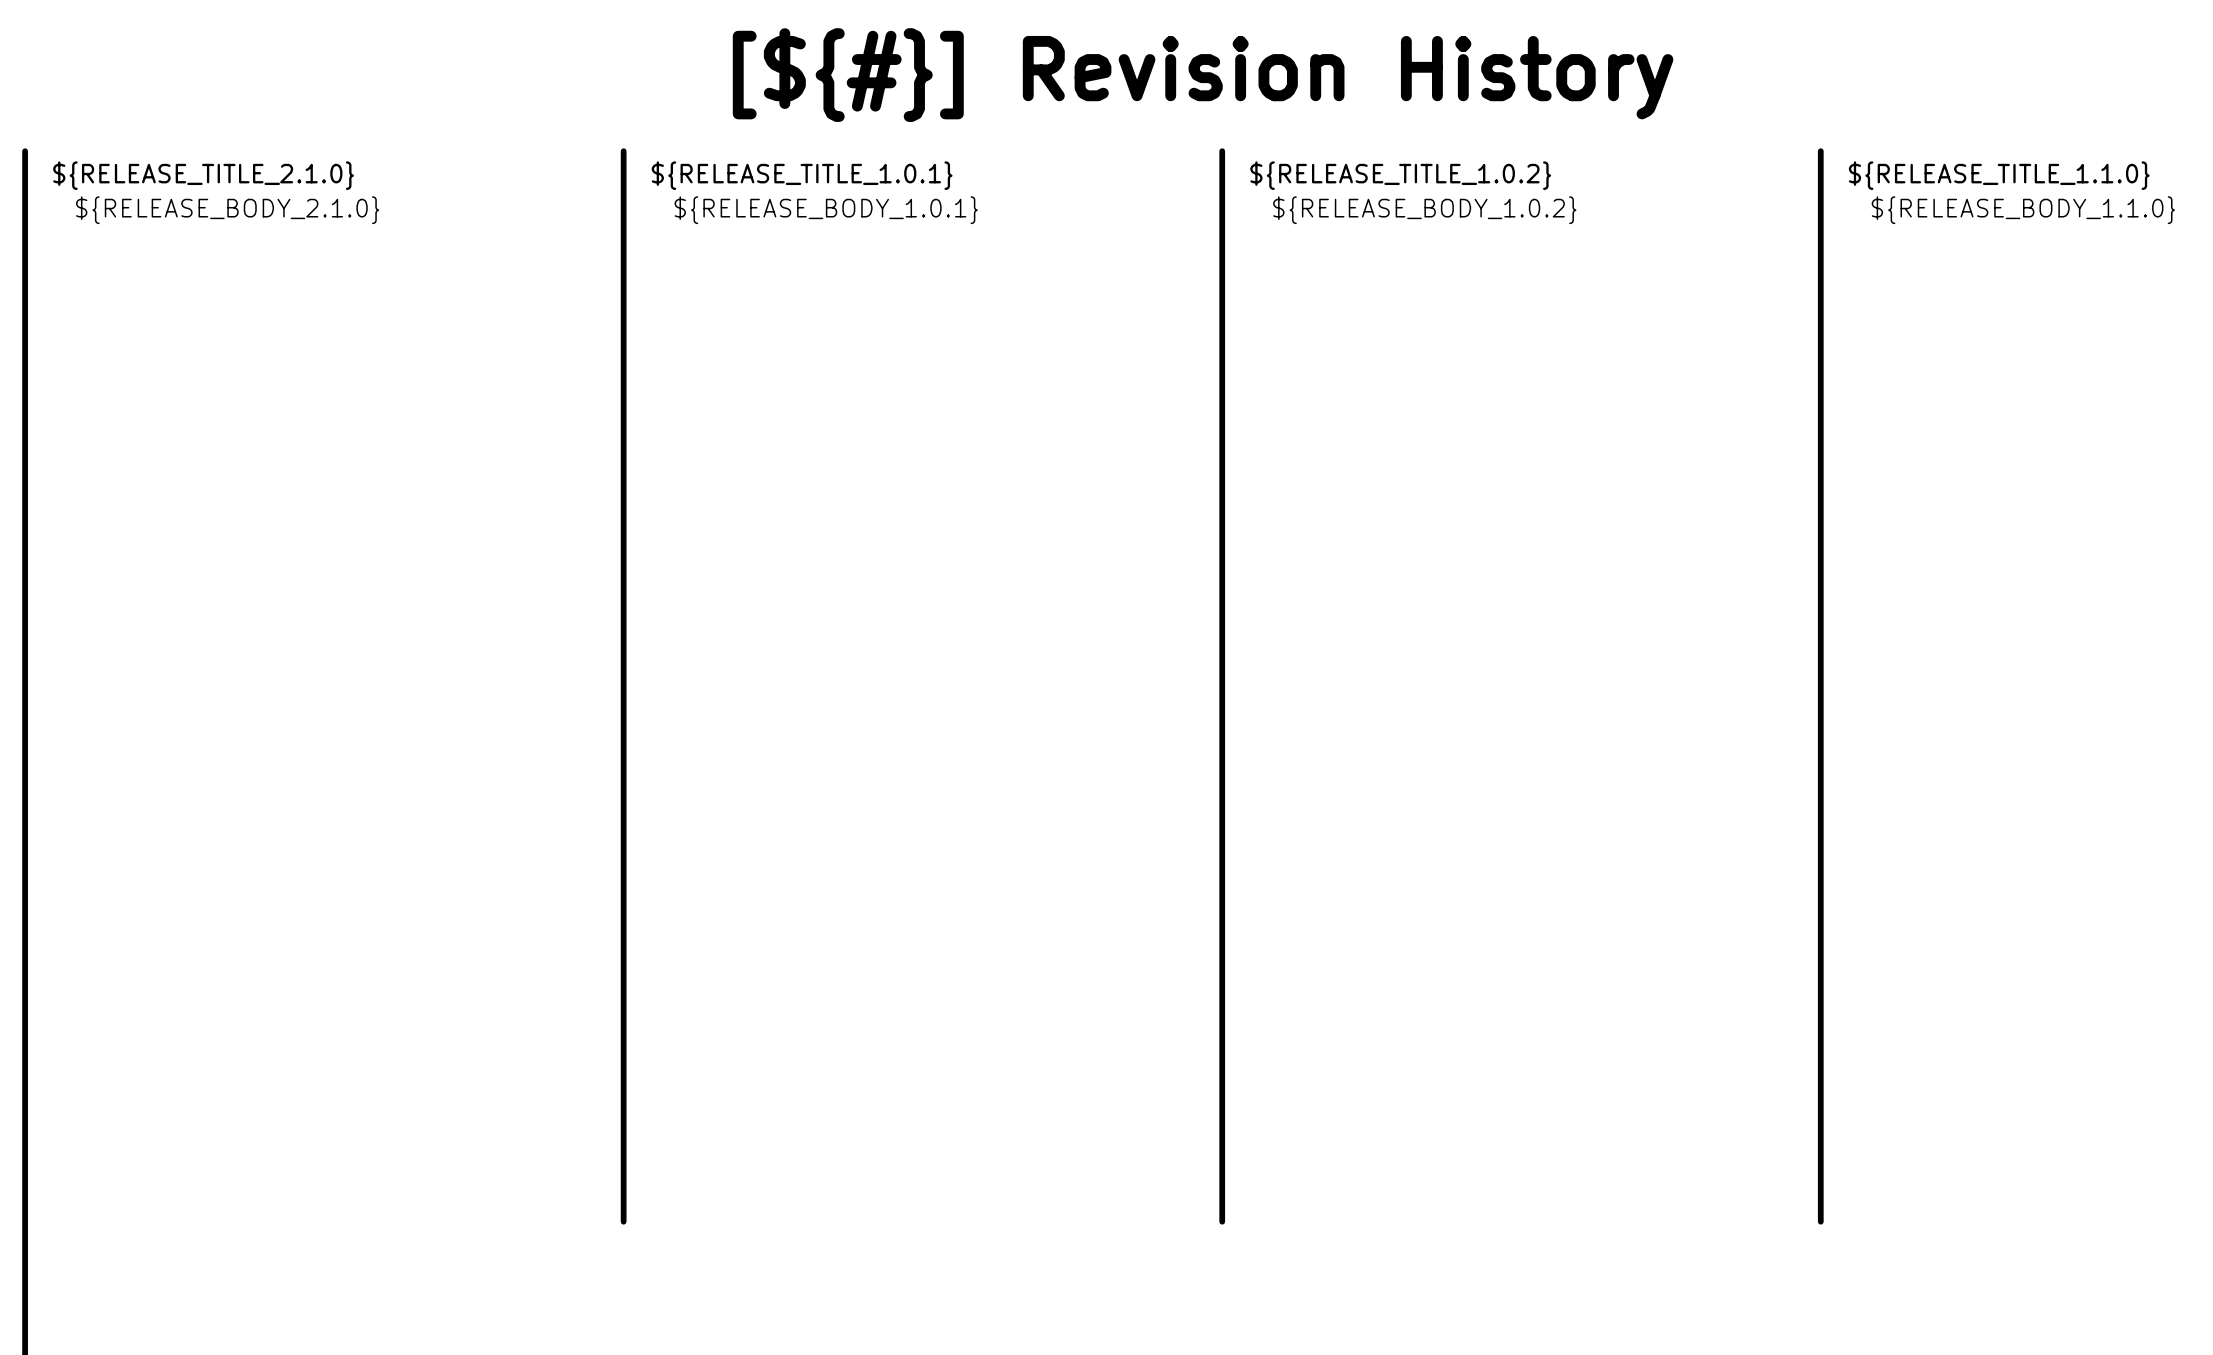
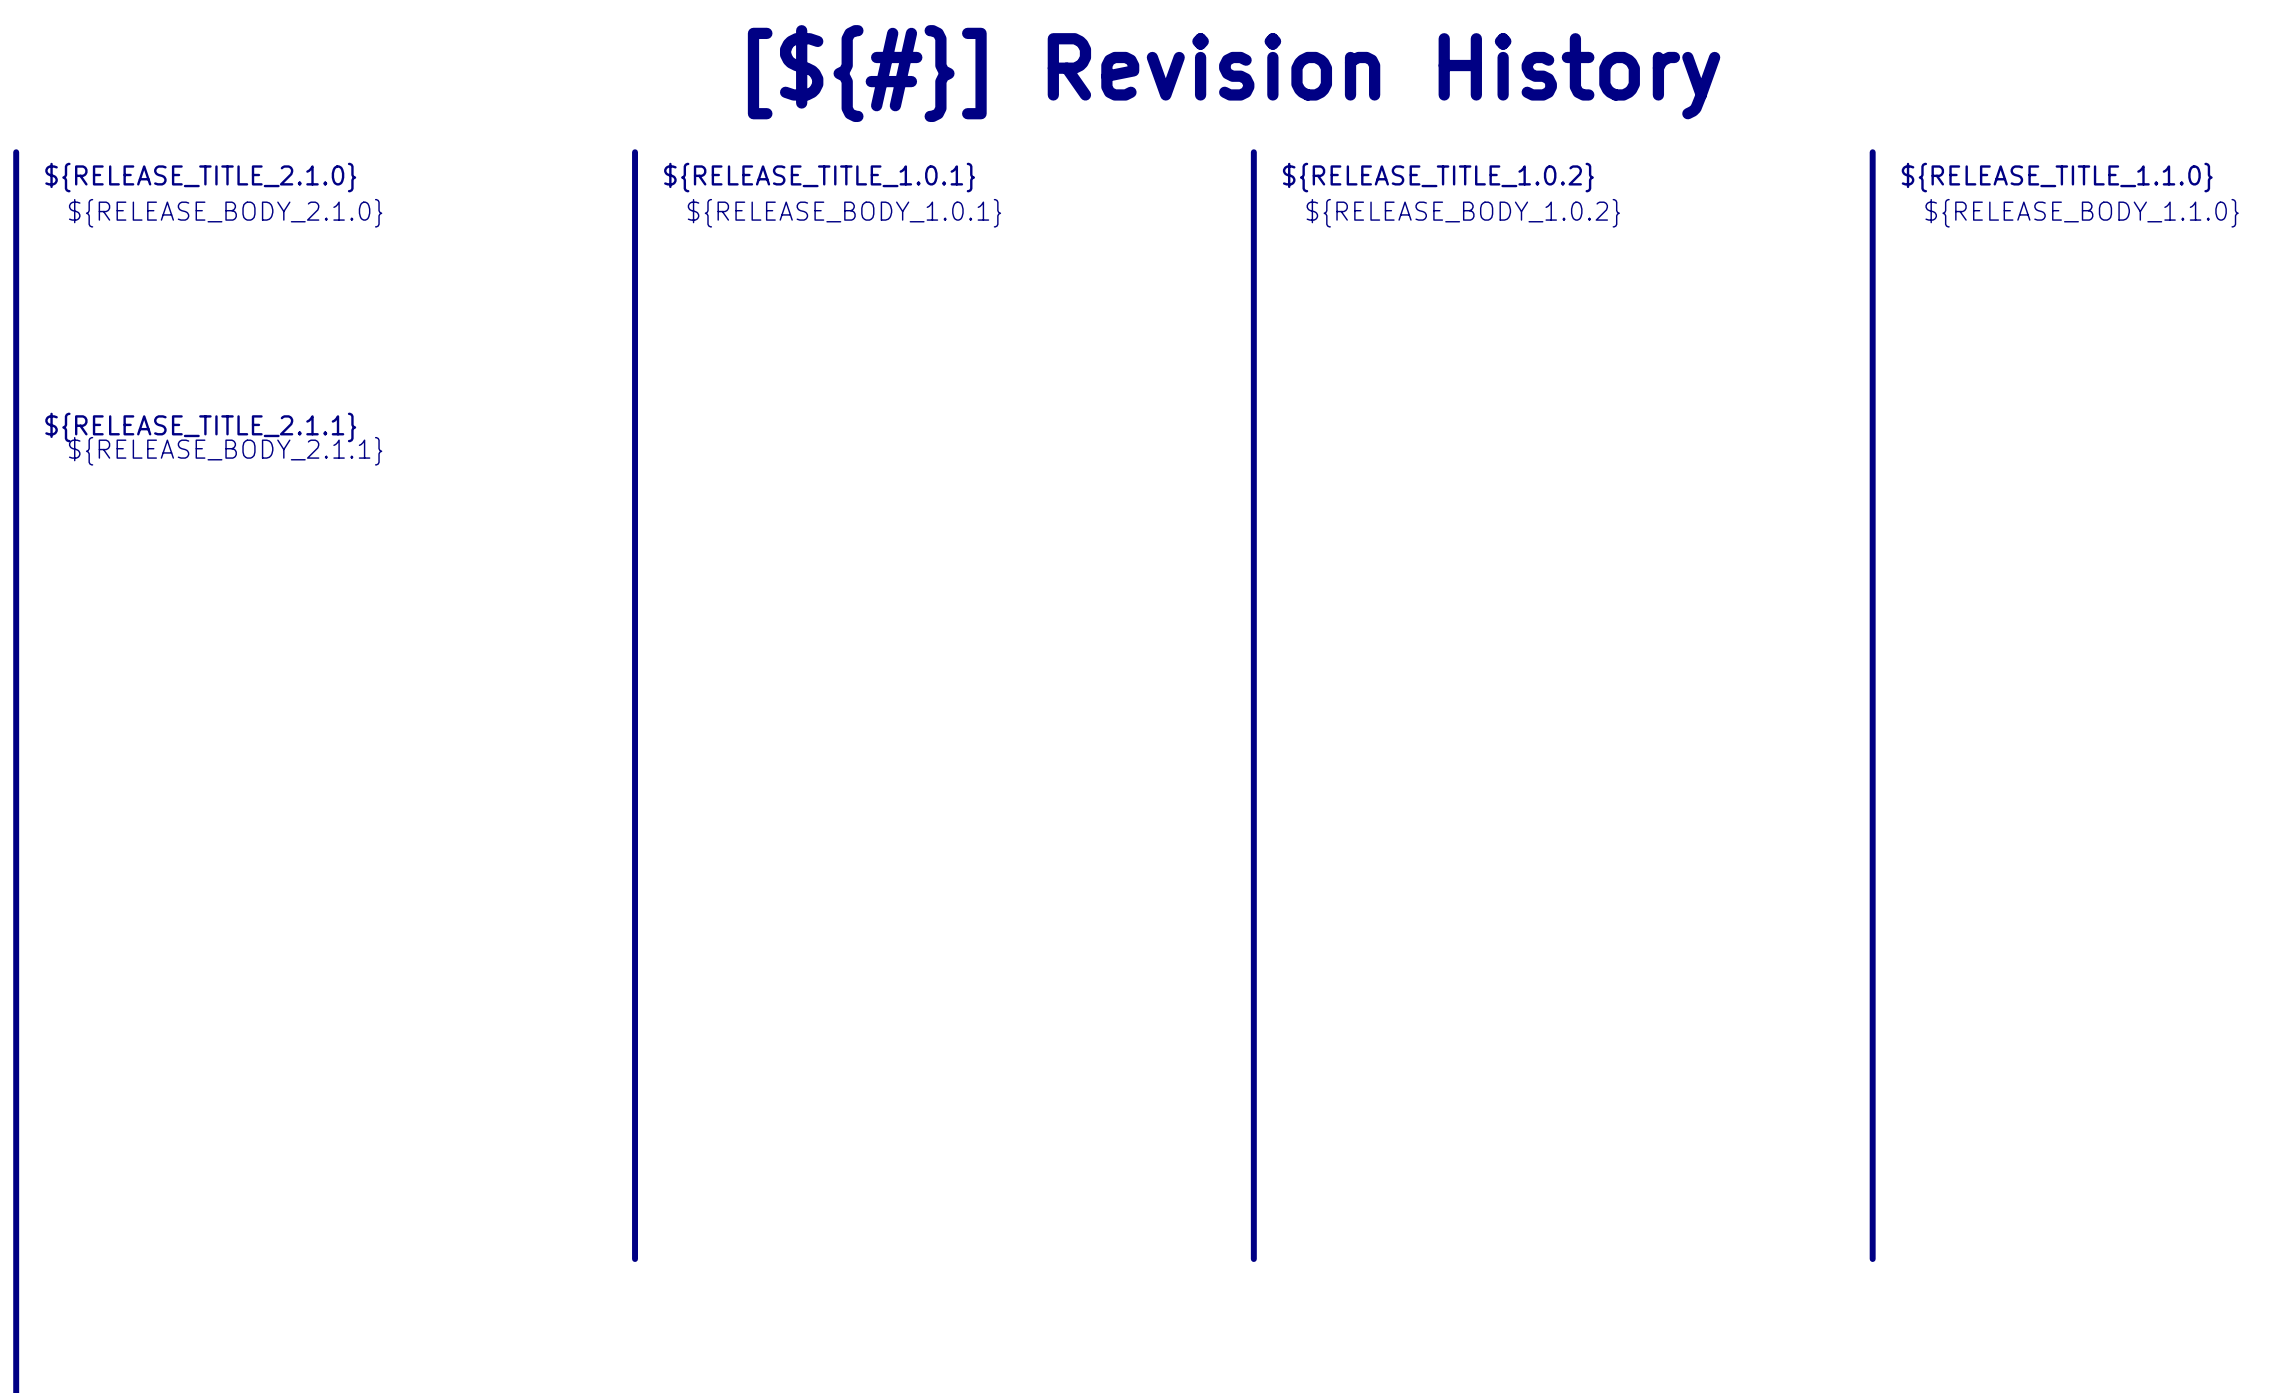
text: none -> ${RELEASE_TITLE_2.1.1} (200, 427)
text: none -> ${RELEASE_BODY_2.1.1} (225, 451)

